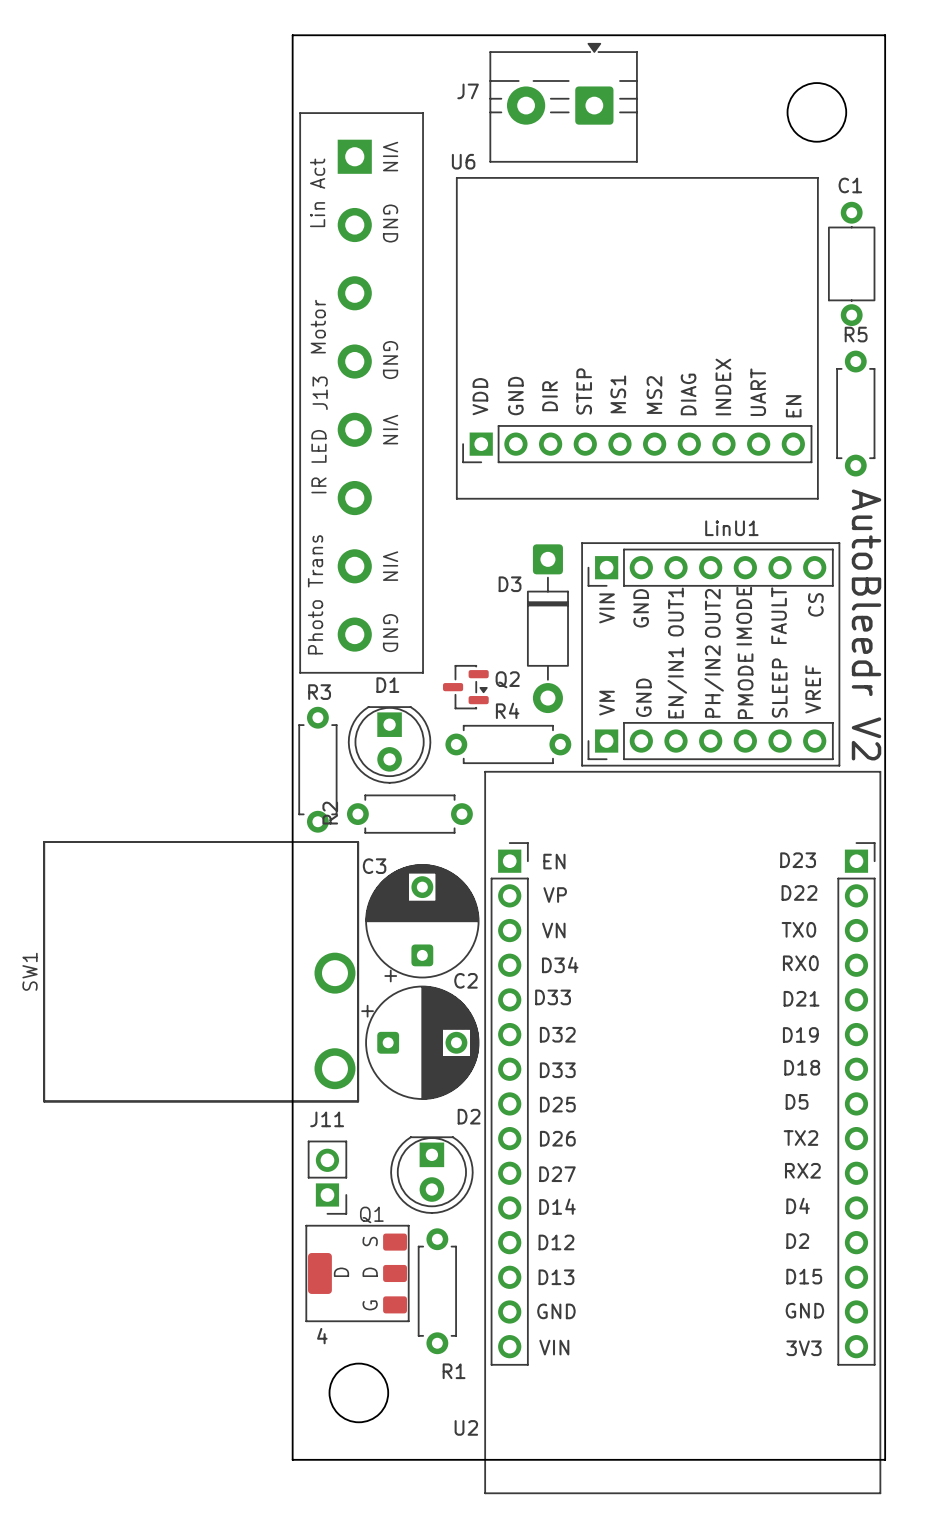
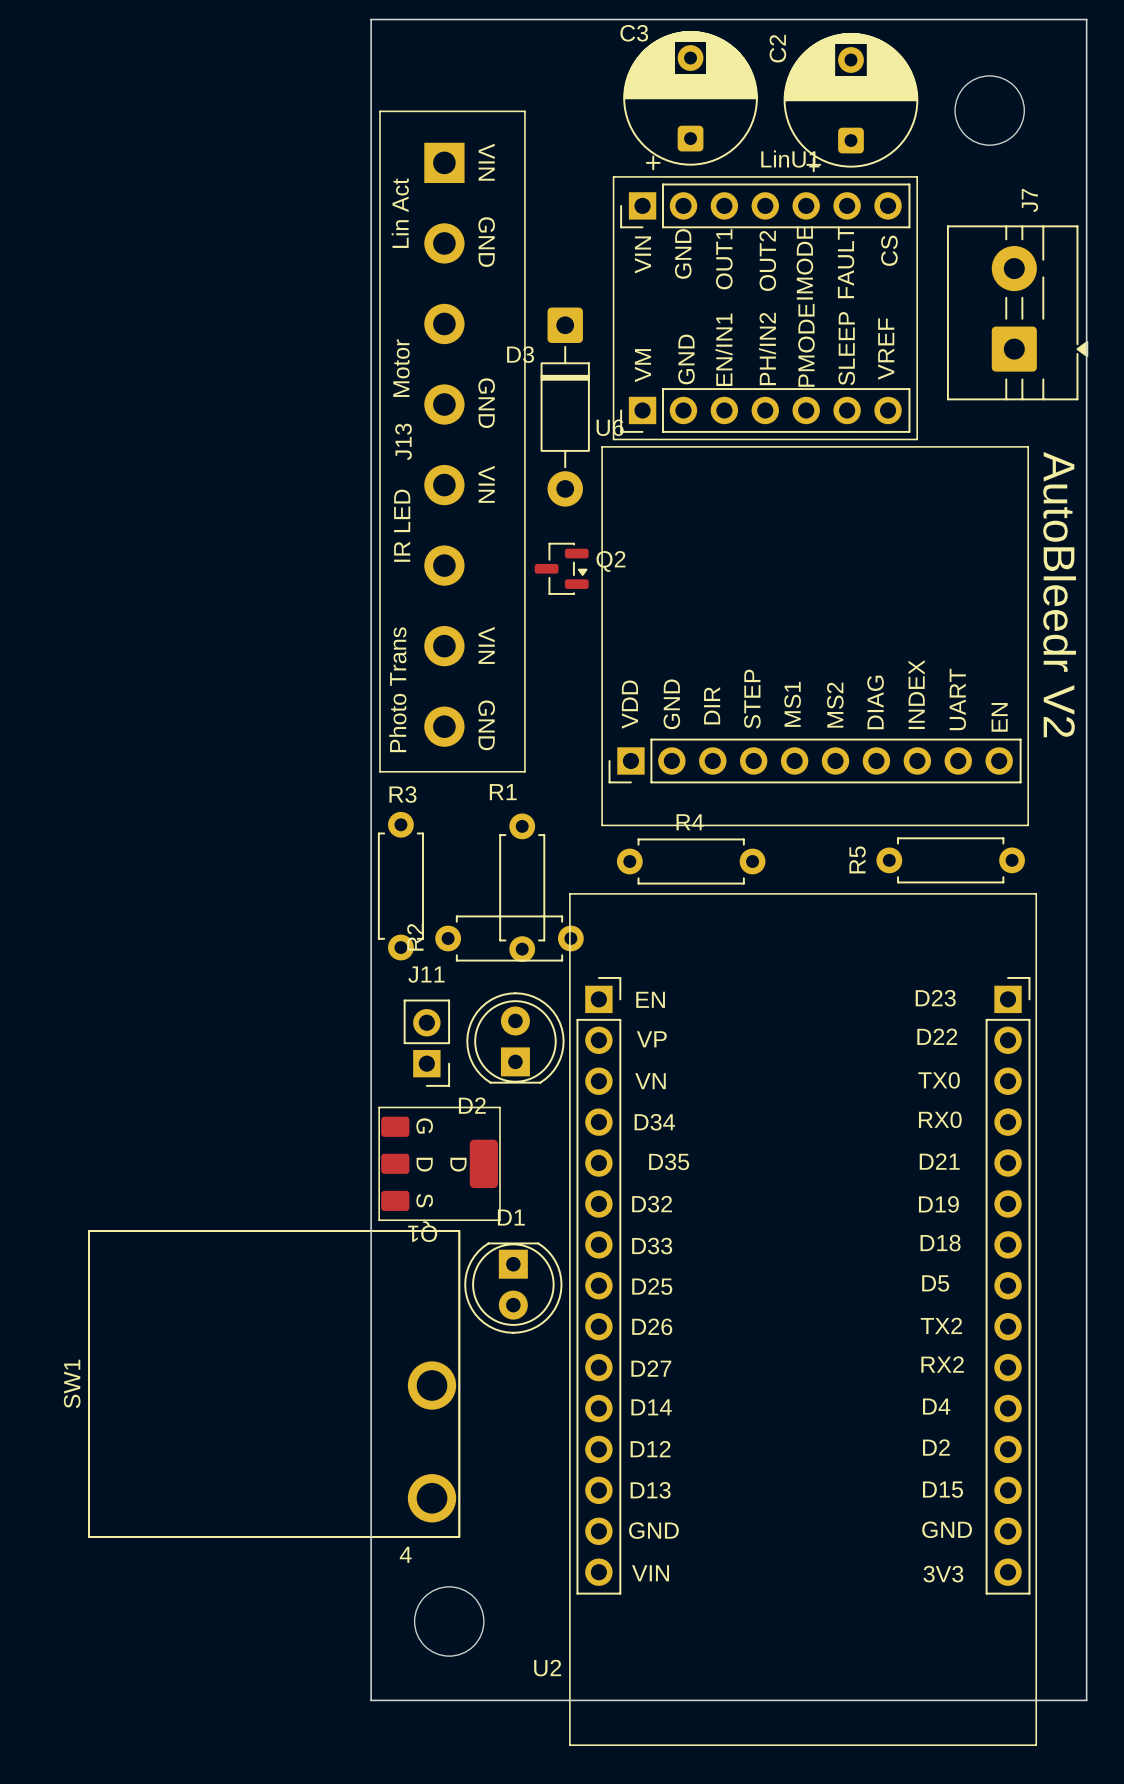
board edge: (885, 35) (885, 1459) -> (1070, 19) (1086, 19) (1086, 1700) (1070, 1700)
J7 rotation: 0° (563, 102) -> 90° clockwise (1017, 312)
J7 position: (563, 102) -> (1017, 312)
C1: (851, 263) -> none
R5 name position: R5 (856, 334) -> R5 (857, 859)
U6 position: (637, 338) -> (815, 636)
R5 rotation: 0° (855, 413) -> 90° clockwise (950, 860)
R5 position: (855, 413) -> (950, 860)
text position: AutoBleedr V2 (866, 624) -> AutoBleedr V2 (1059, 594)
D3 position: (547, 628) -> (565, 407)
LinU1 position: (710, 654) -> (765, 308)
Q2 position: (465, 687) -> (561, 568)
D1 position: (389, 744) -> (513, 1288)
R4 position: (508, 744) -> (691, 861)
C3 position: (422, 923) -> (690, 100)
SW1 position: (201, 971) -> (274, 1383)
text: D33 (553, 997) -> D35 (669, 1161)
C2 rotation: 0° (420, 1042) -> 90° counterclockwise (850, 102)
C2 position: (420, 1042) -> (850, 102)
U2 position: (682, 1132) -> (803, 1319)
D2 rotation: 0° (431, 1175) -> 180° (515, 1037)
D2 position: (431, 1175) -> (515, 1037)
J11 position: (327, 1177) -> (426, 1043)
Q1 rotation: 0° (357, 1273) -> 180° (439, 1163)
Q1 position: (357, 1273) -> (439, 1163)
R1 position: (437, 1291) -> (522, 887)
R1 name position: R1 (454, 1371) -> R1 (503, 792)

